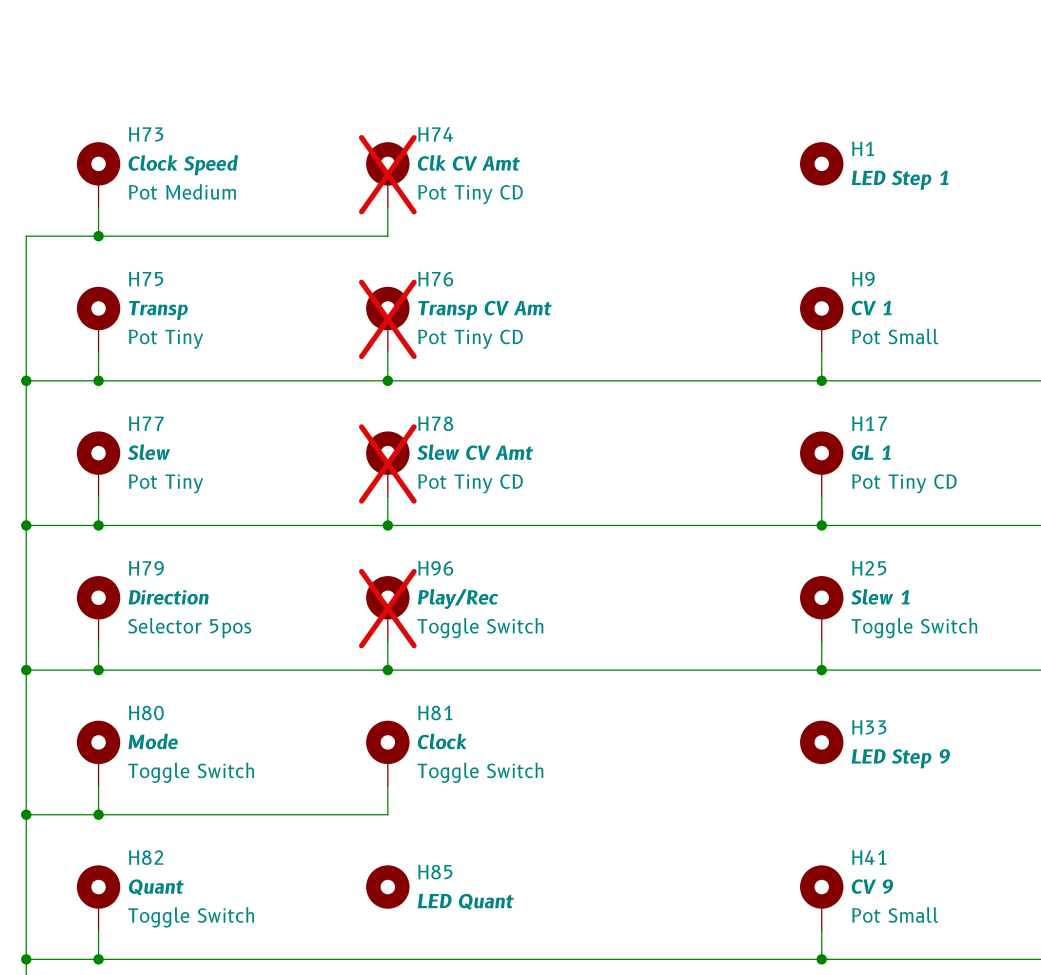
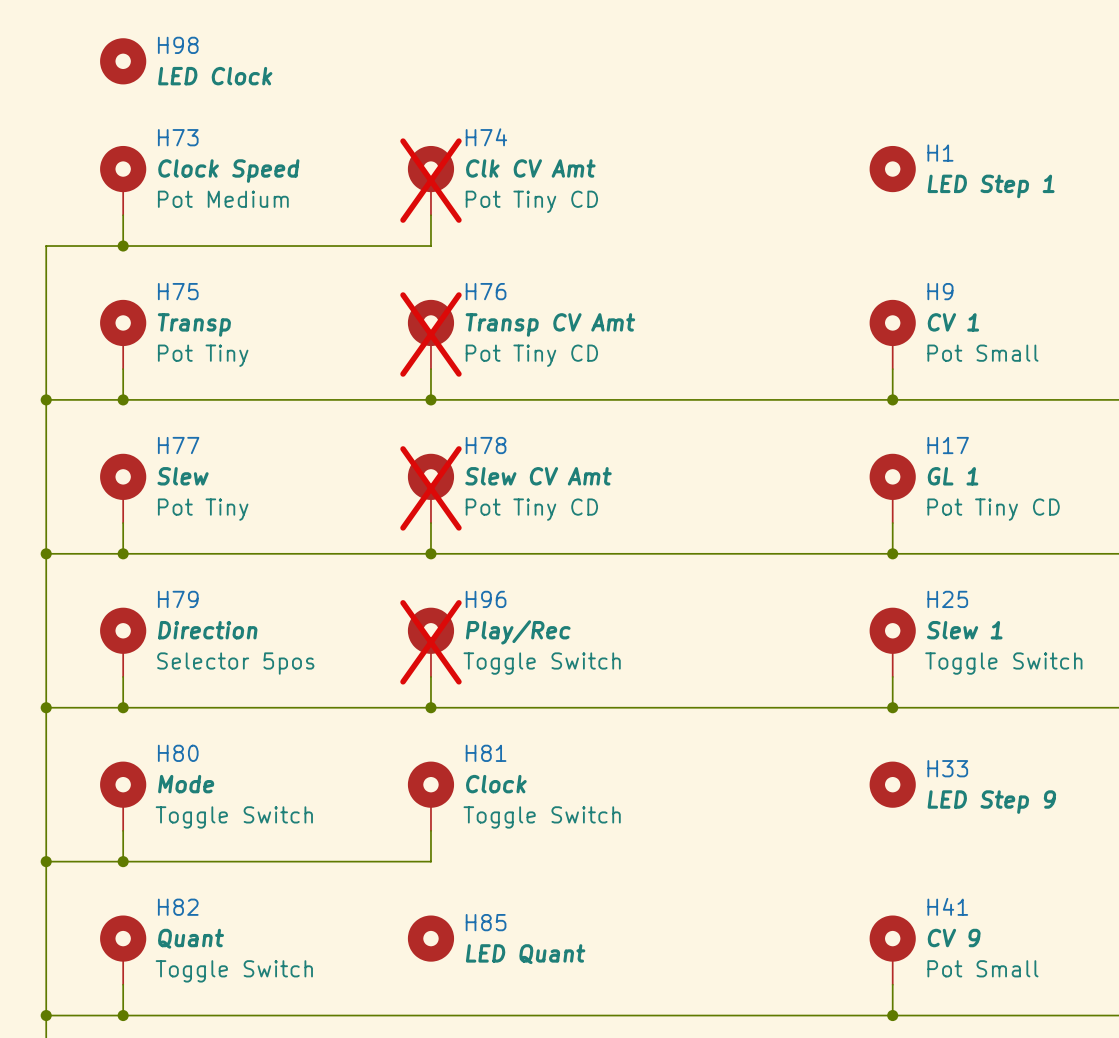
H98: none -> LED Clock (123, 61)

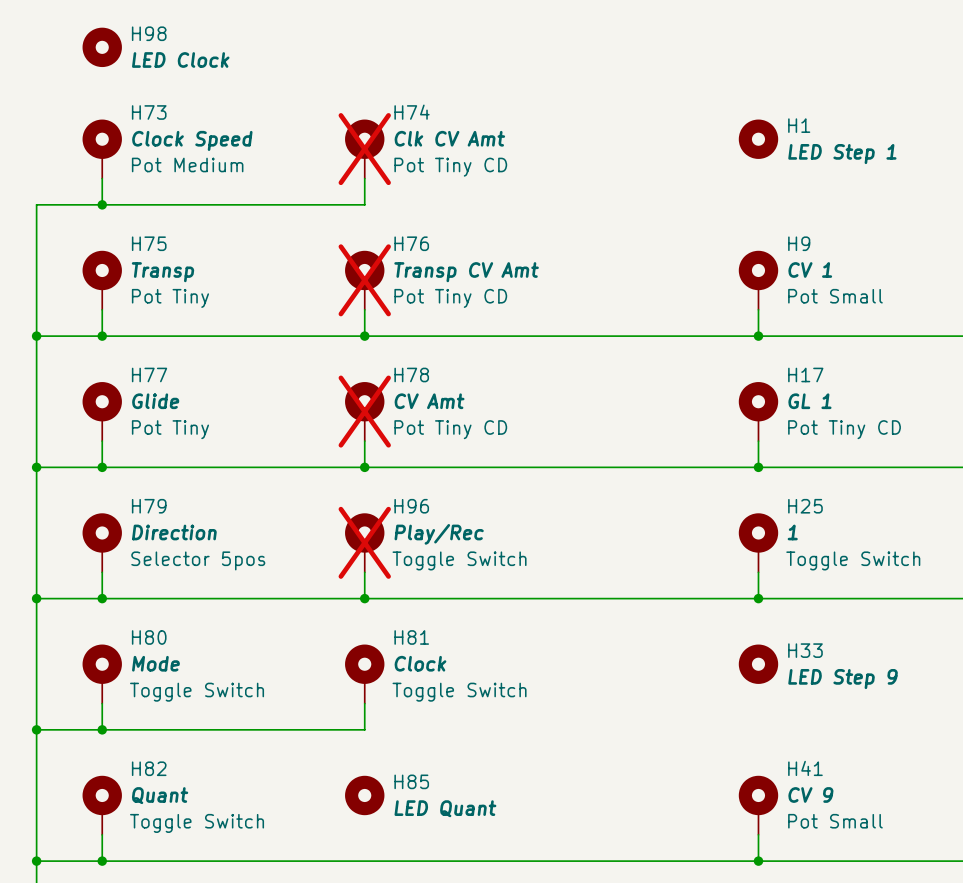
H77 value: Slew (183, 476) -> Glide (155, 401)
H78 value: Slew CV Amt (538, 476) -> CV Amt (429, 401)
H25 value: Slew 1 (964, 630) -> 1 (792, 532)

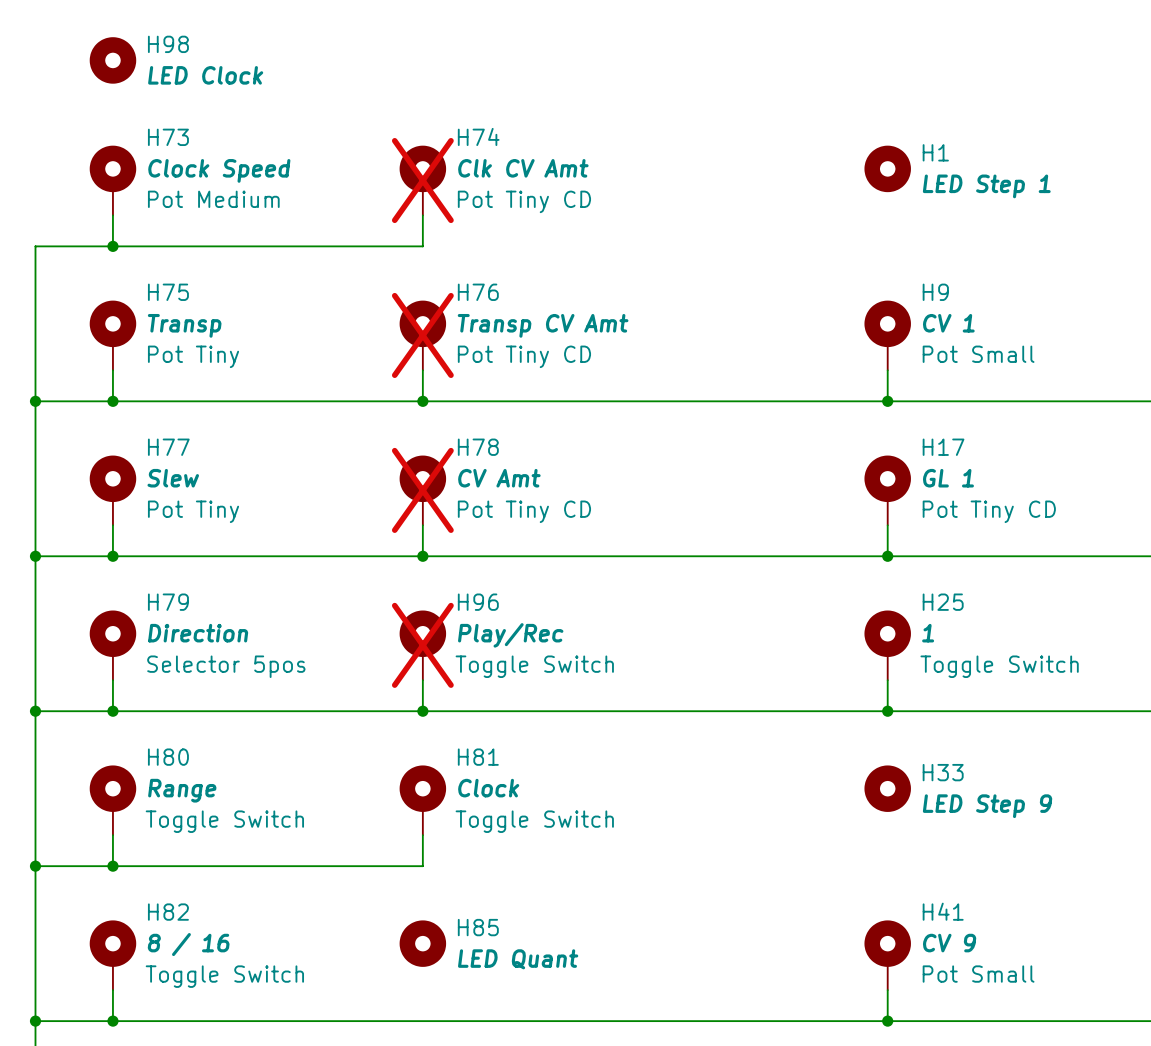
H77 value: Glide (155, 401) -> Slew (173, 478)
H80 value: Mode (155, 663) -> Range (182, 790)
H82 value: Quant (160, 795) -> 8 / 16 (188, 944)

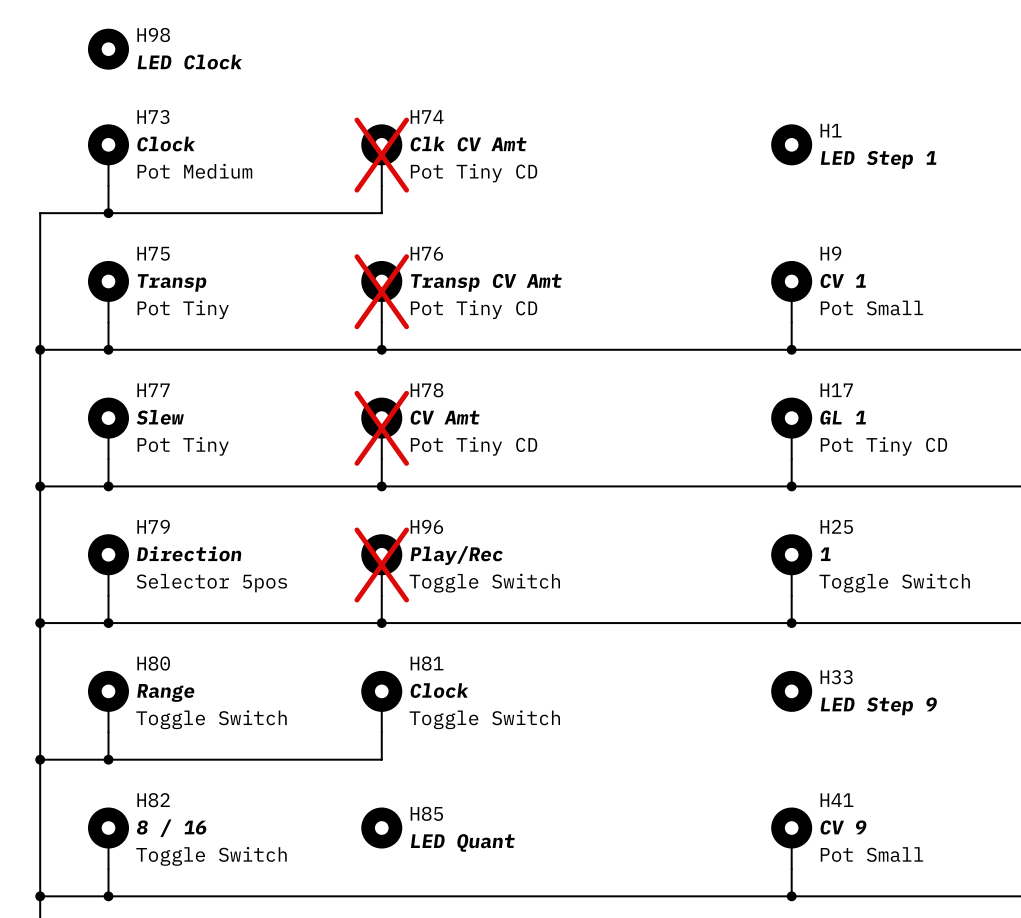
H73 value: Clock Speed (219, 170) -> Clock (166, 144)

